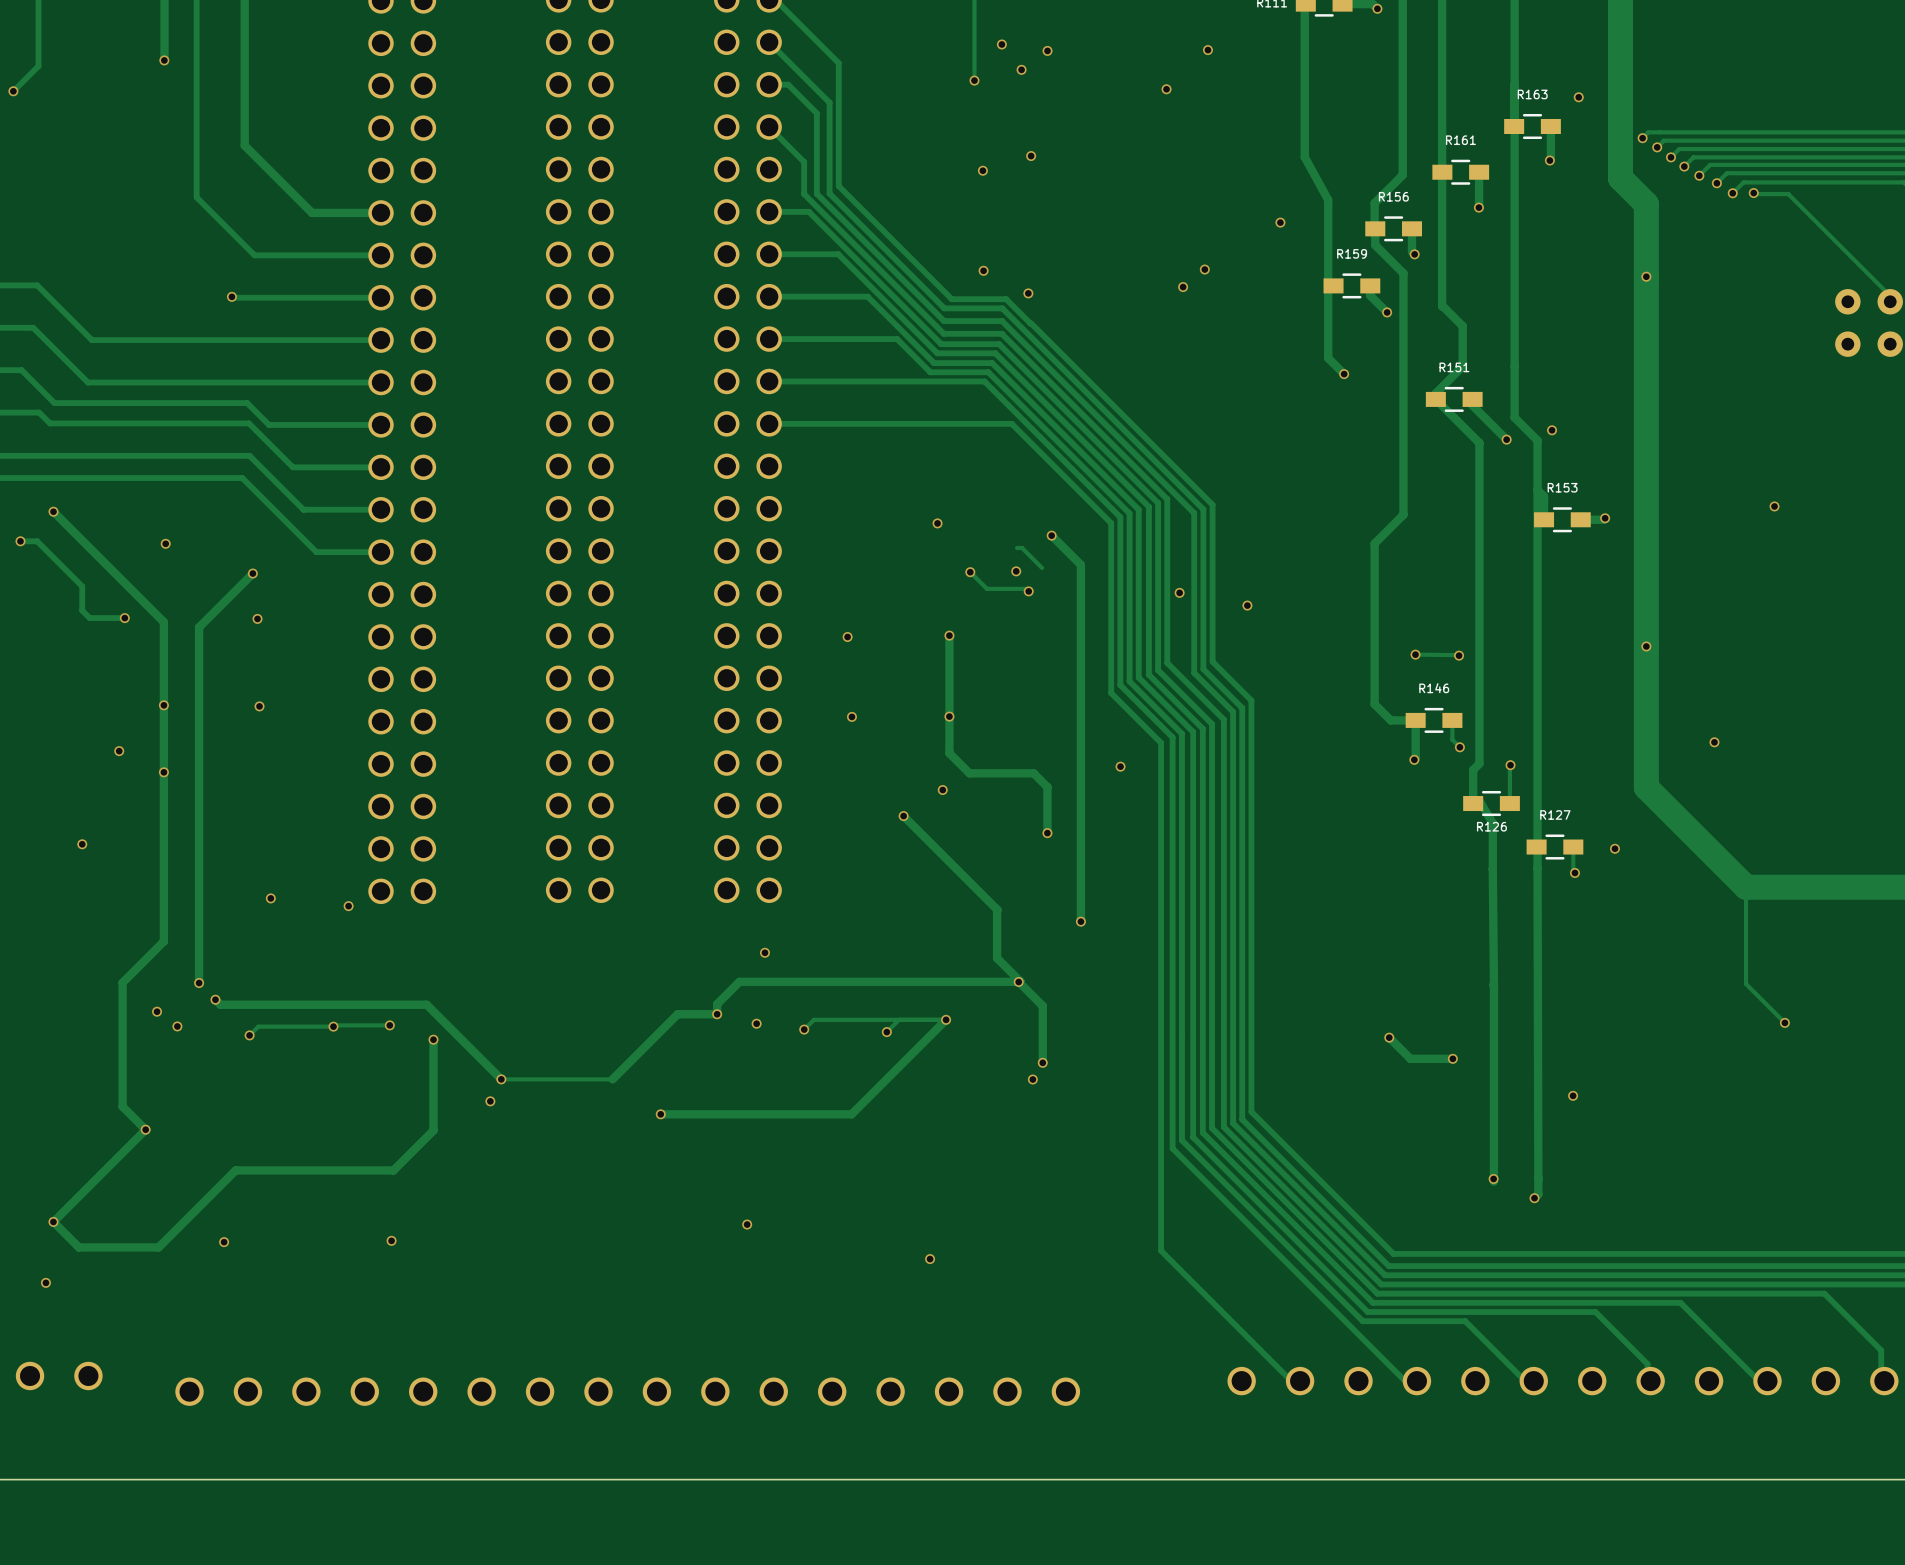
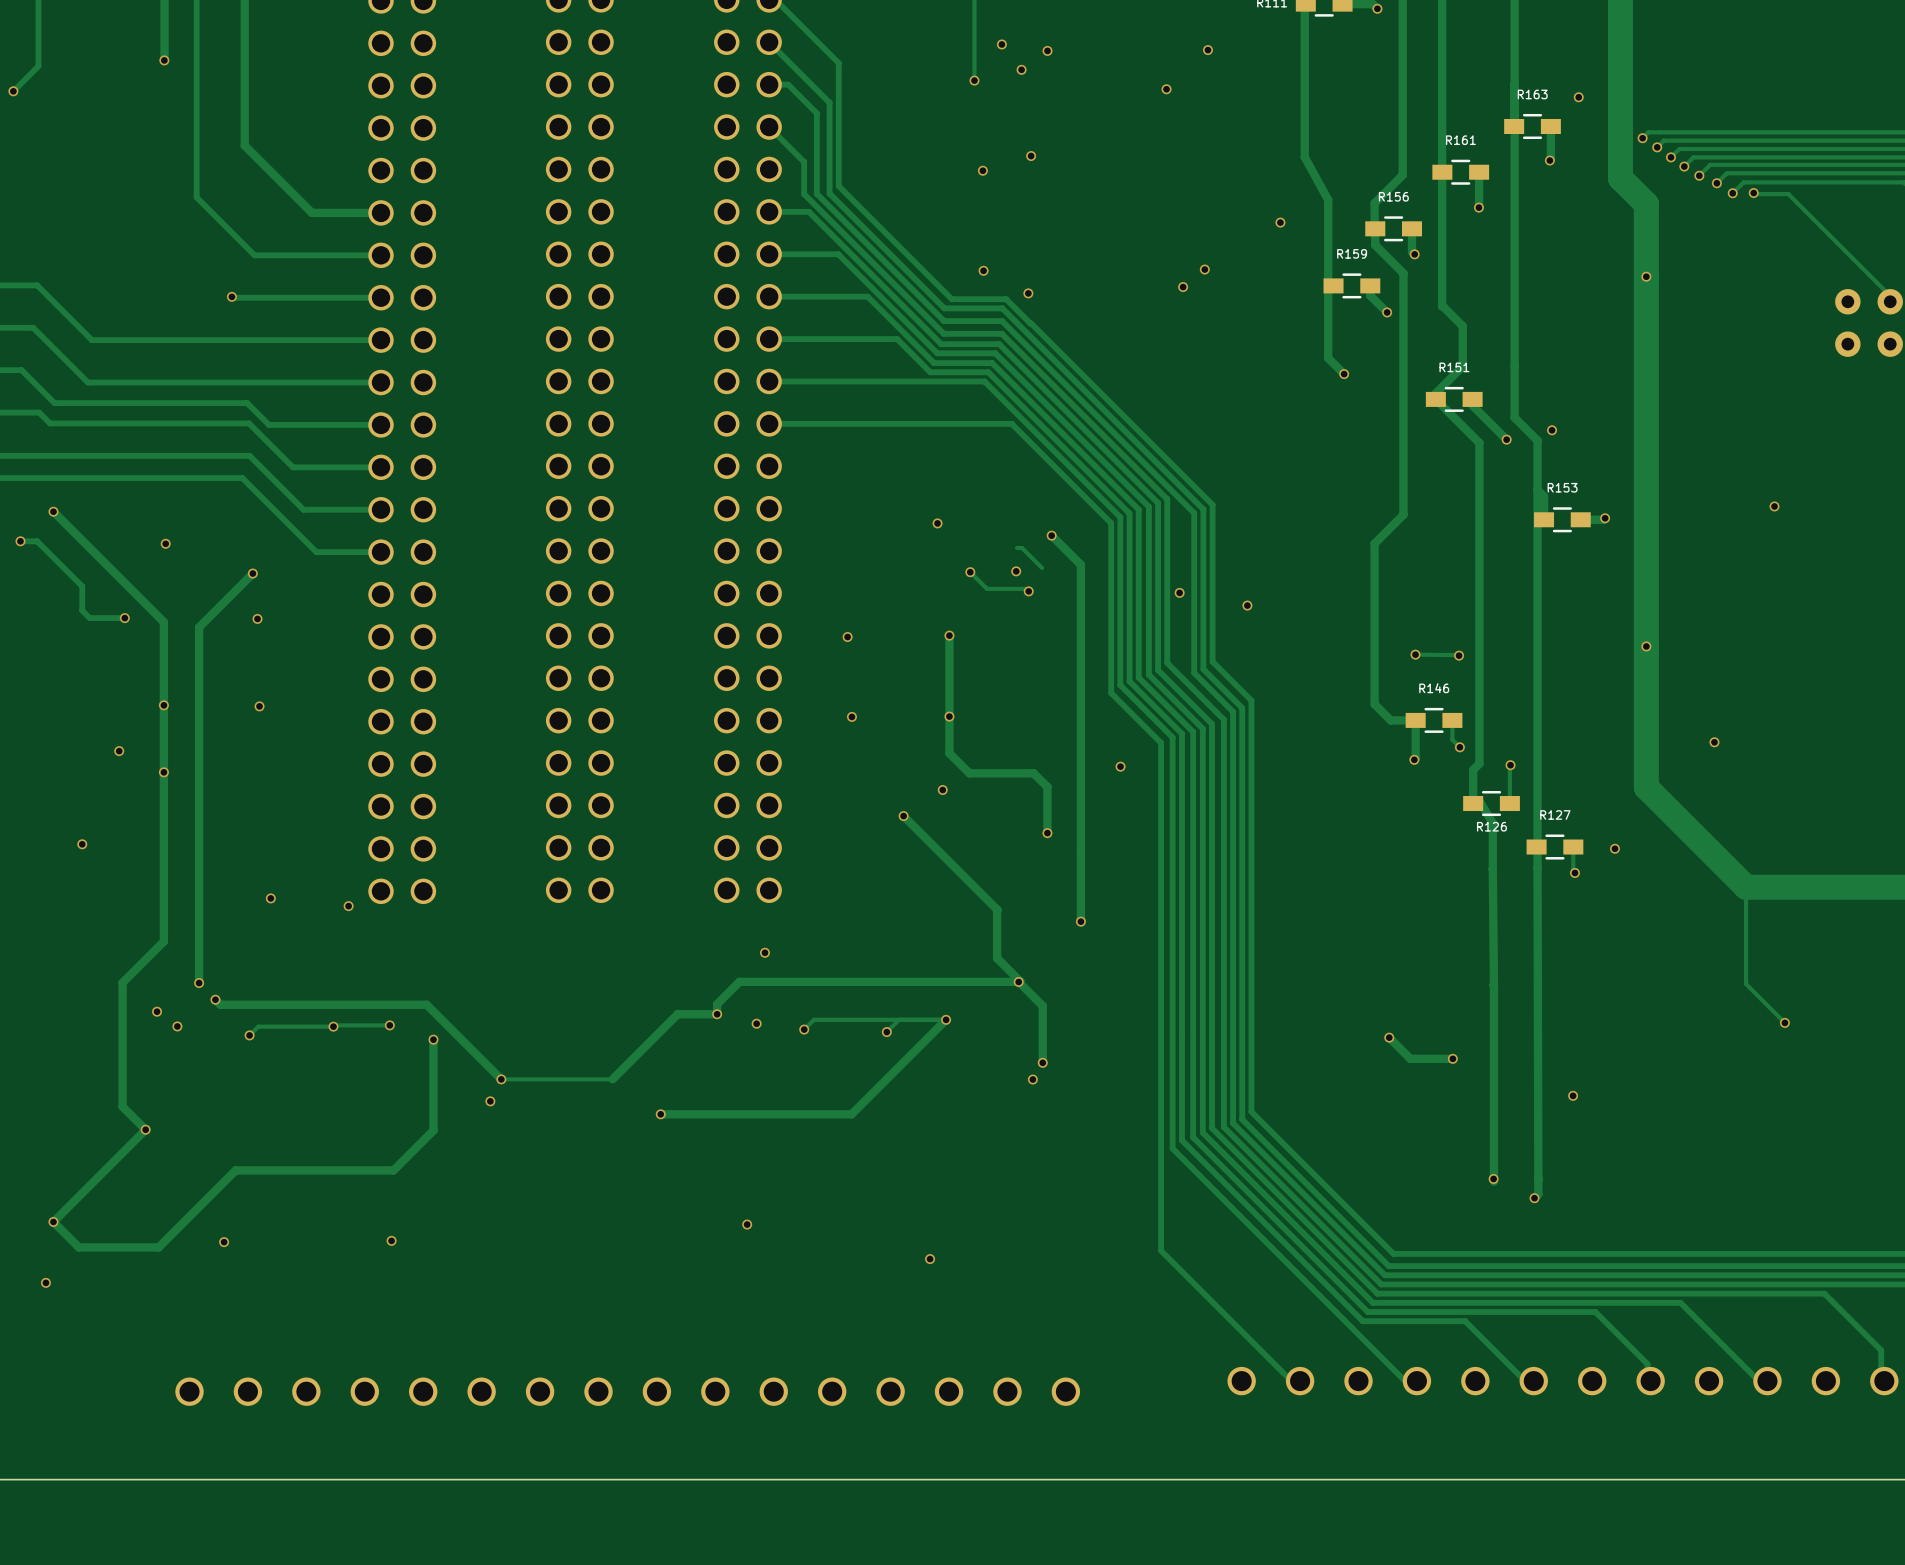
part: (59, 1376) -> none

